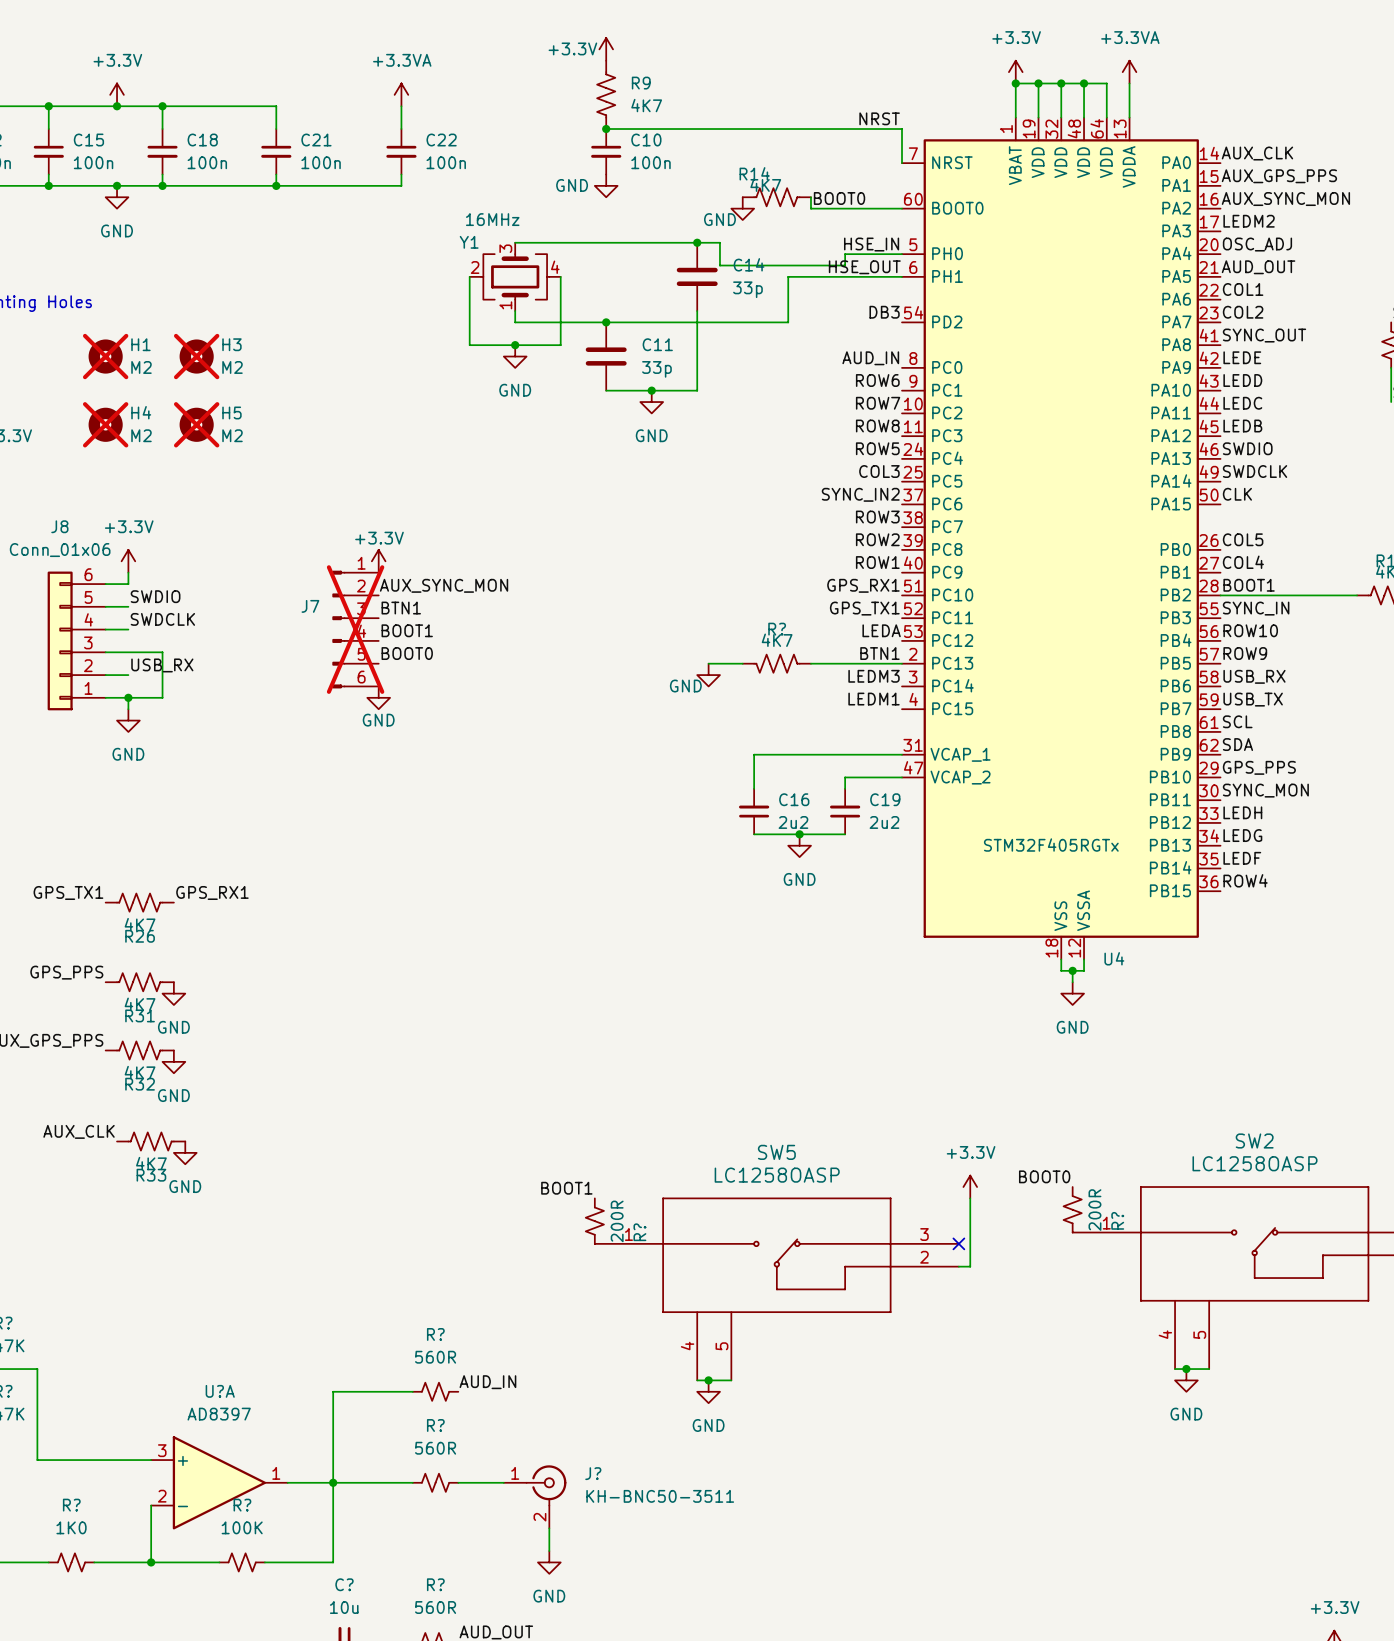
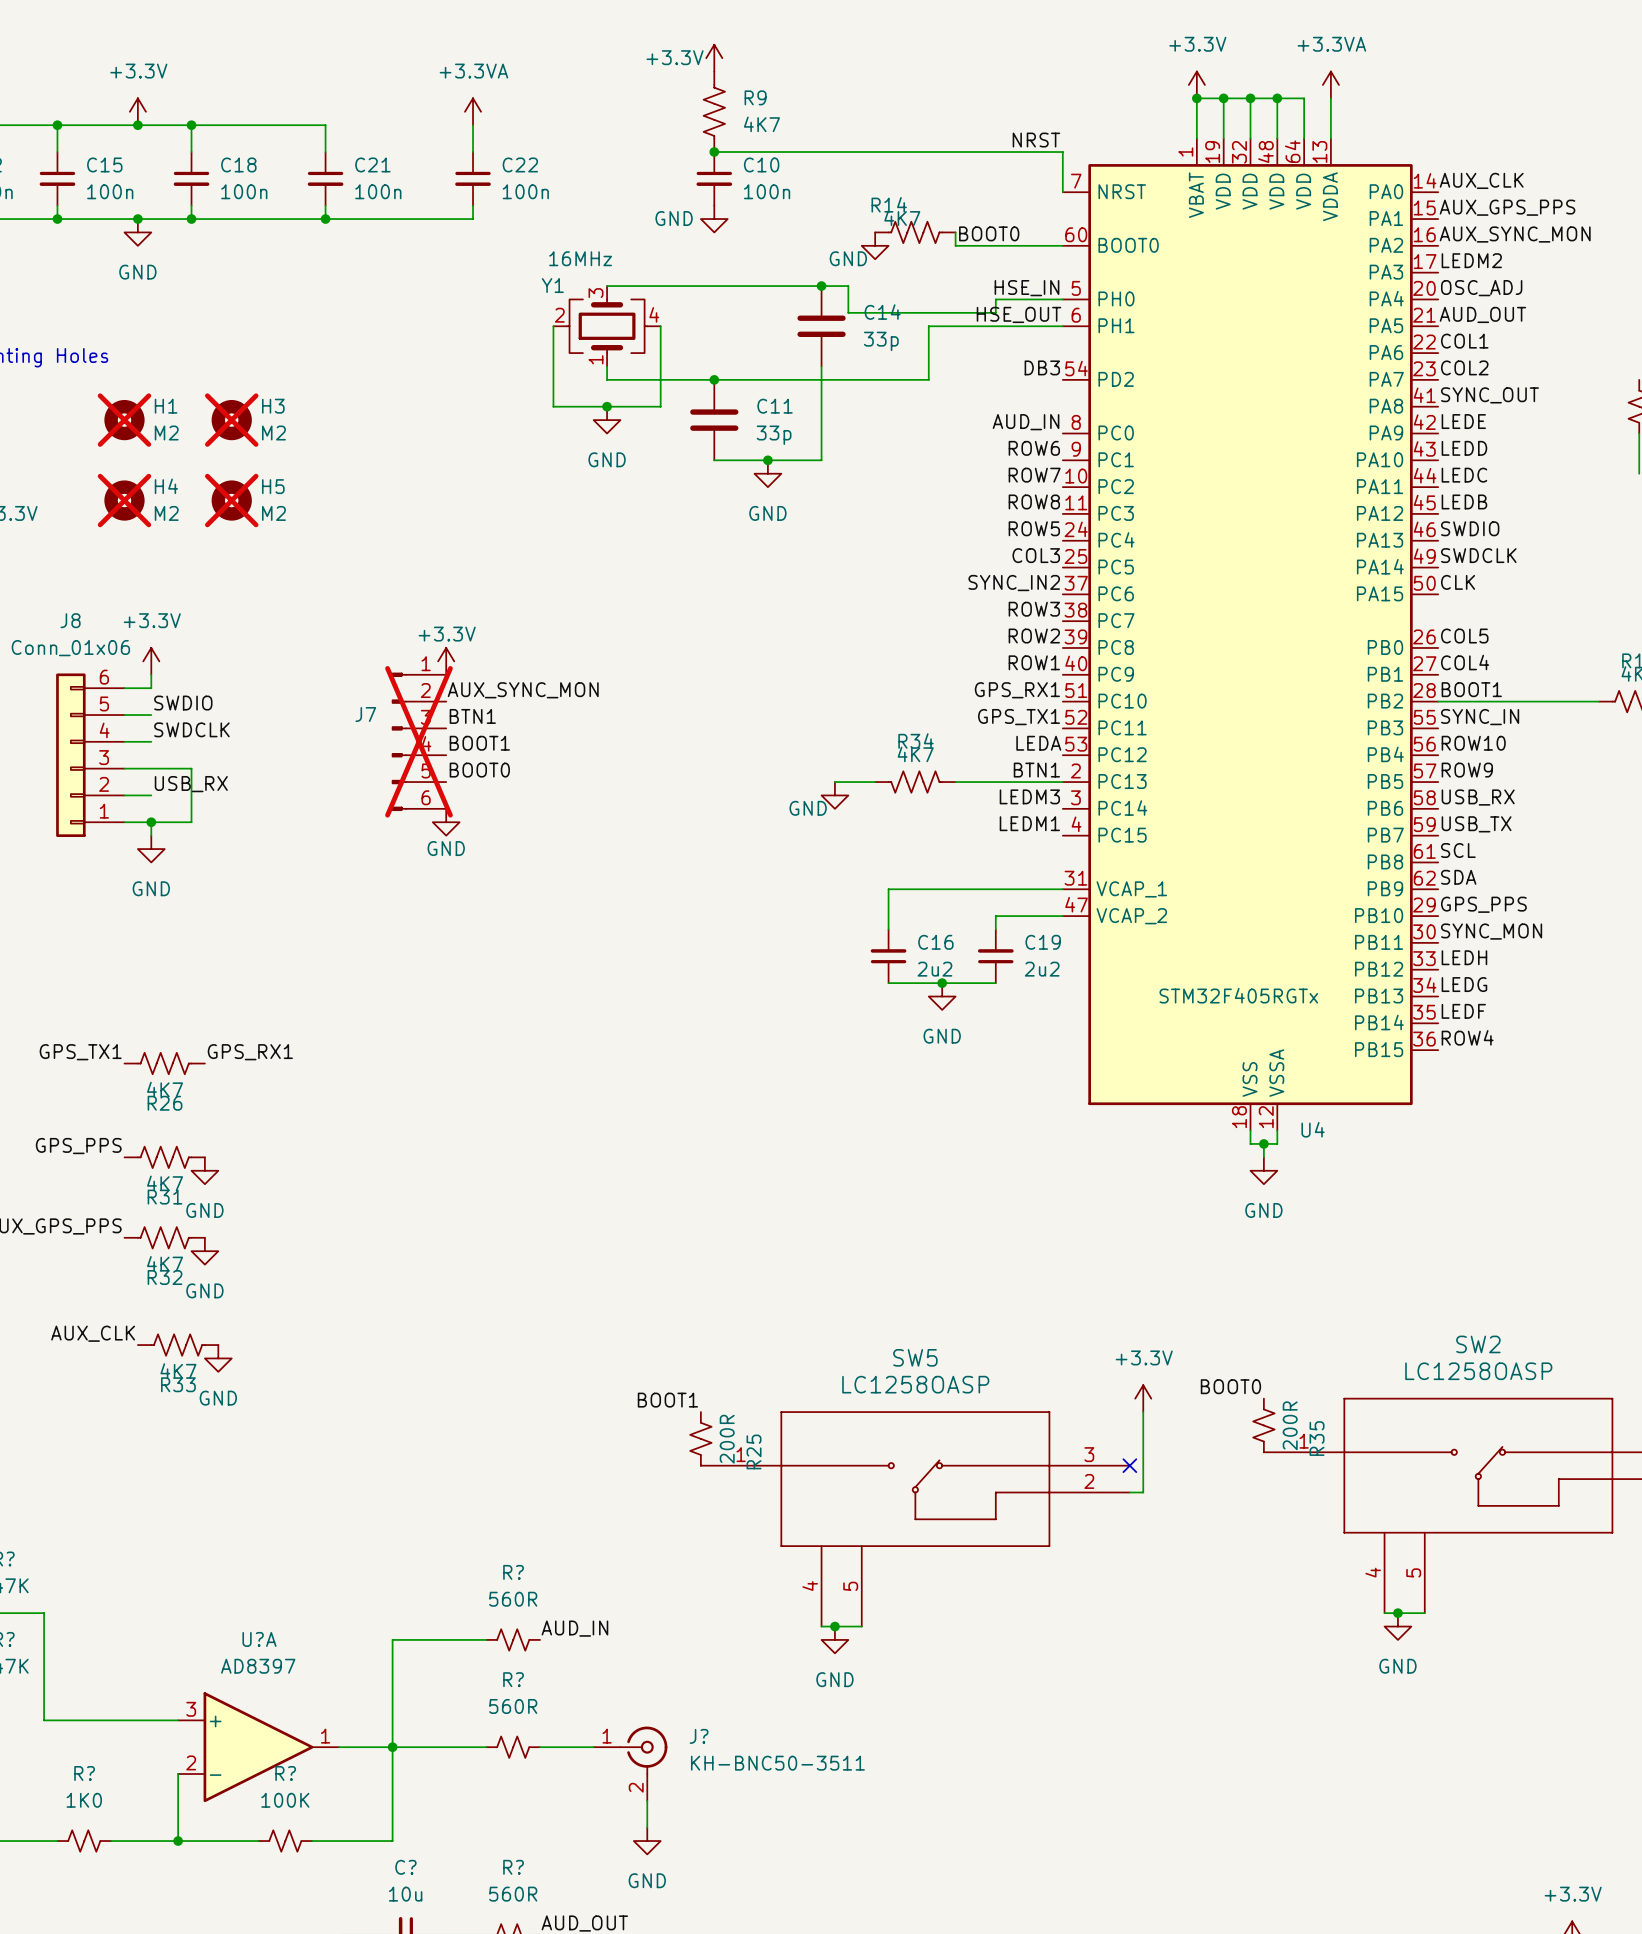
R? name: R? (777, 629) -> R34 (916, 741)
R? name: R? (1117, 1220) -> R35 (1317, 1438)
R? name: R? (639, 1232) -> R25 (754, 1451)

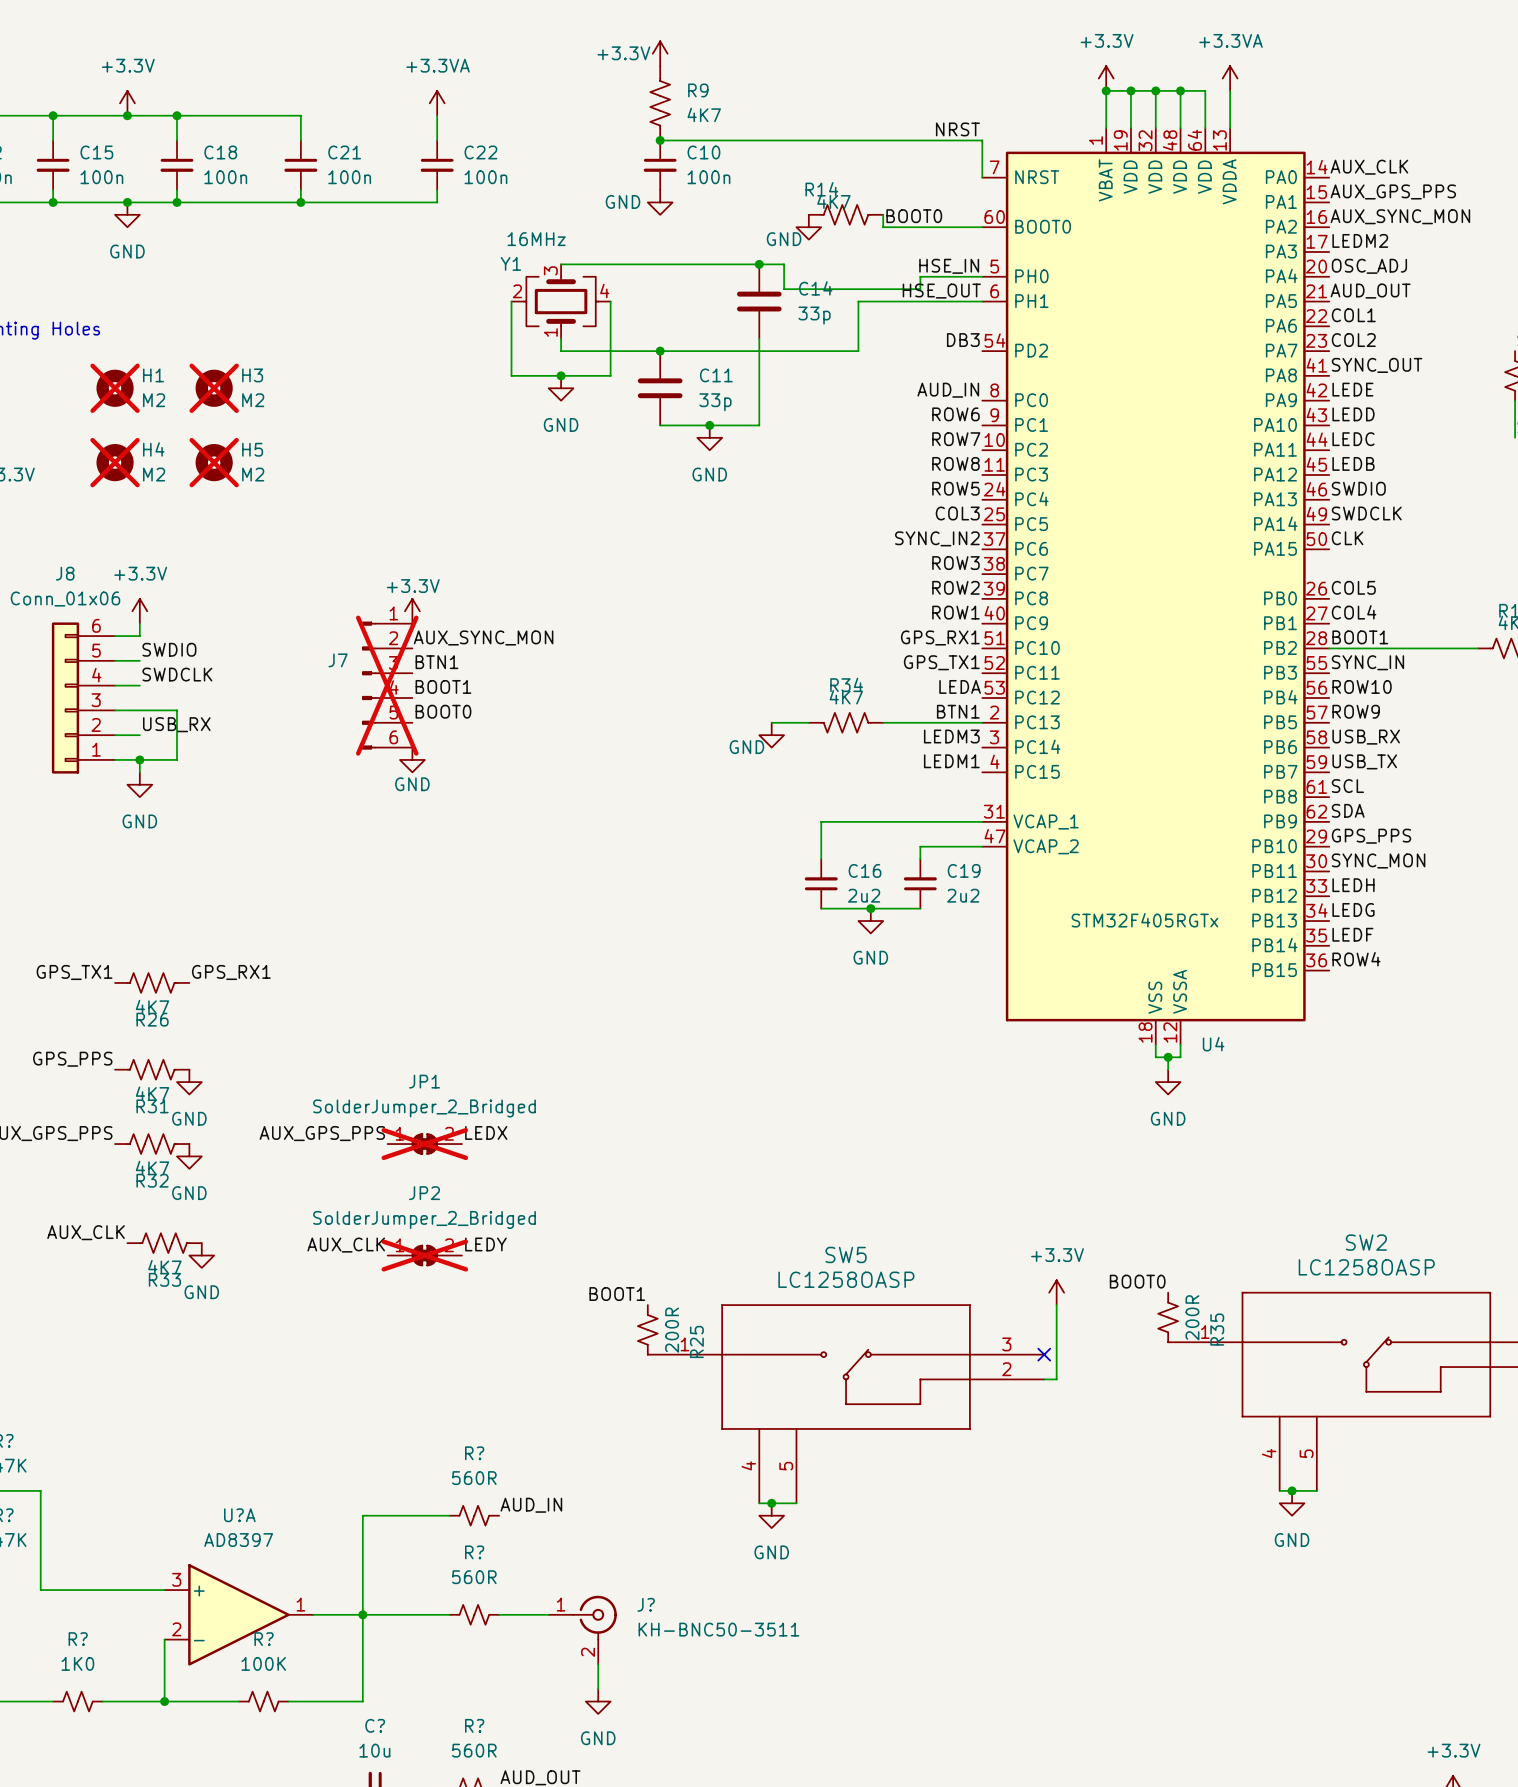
label: none -> LEDX (486, 1132)
label: none -> AUX_GPS_PPS (322, 1133)
JP1: none -> SolderJumper_2_Bridged (424, 1144)
label: none -> LEDY (485, 1244)
label: none -> AUX_CLK (346, 1245)
JP2: none -> SolderJumper_2_Bridged (424, 1255)

